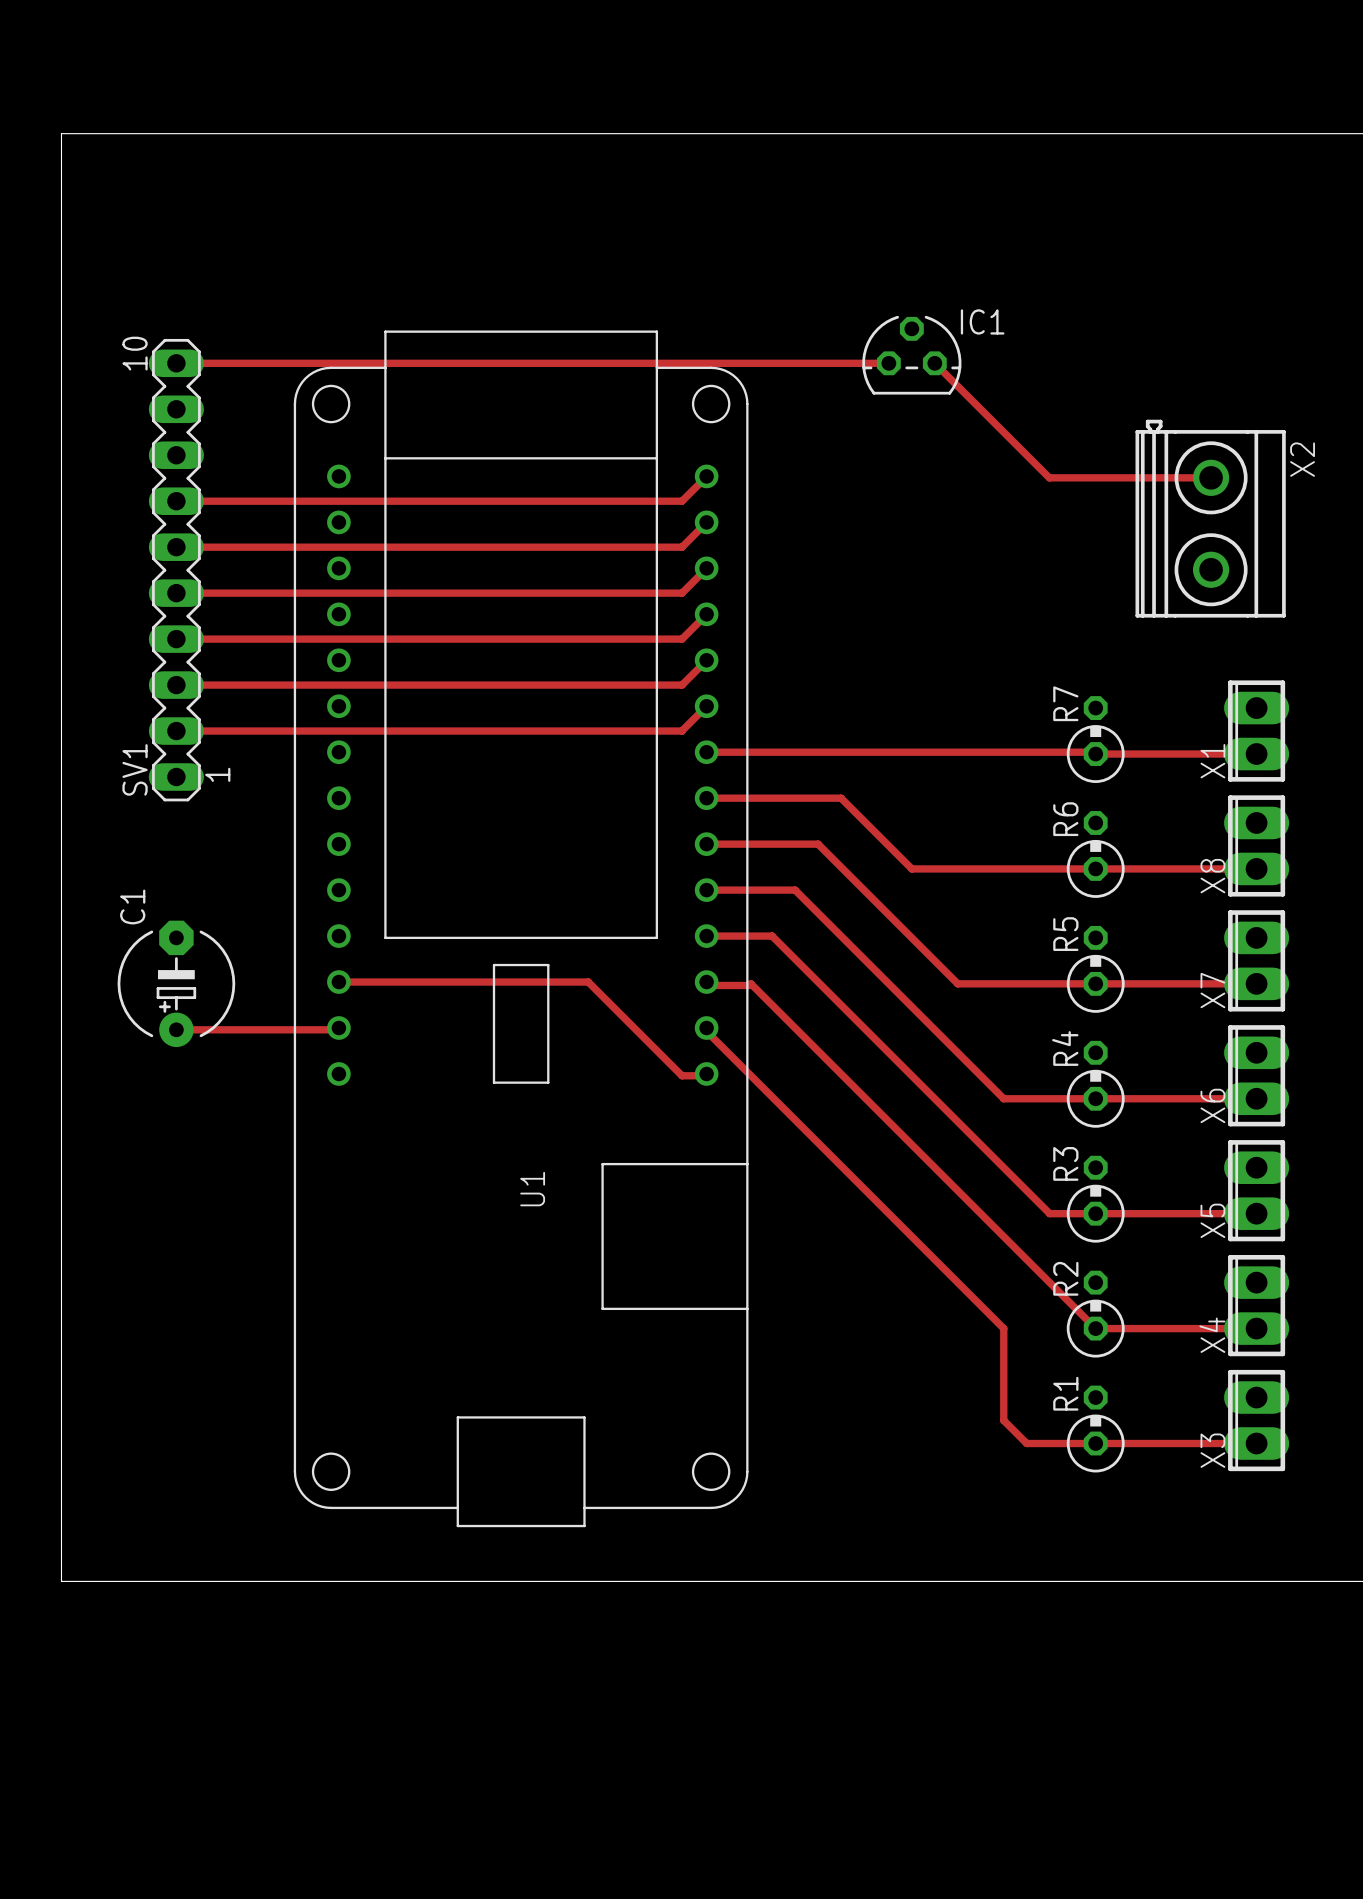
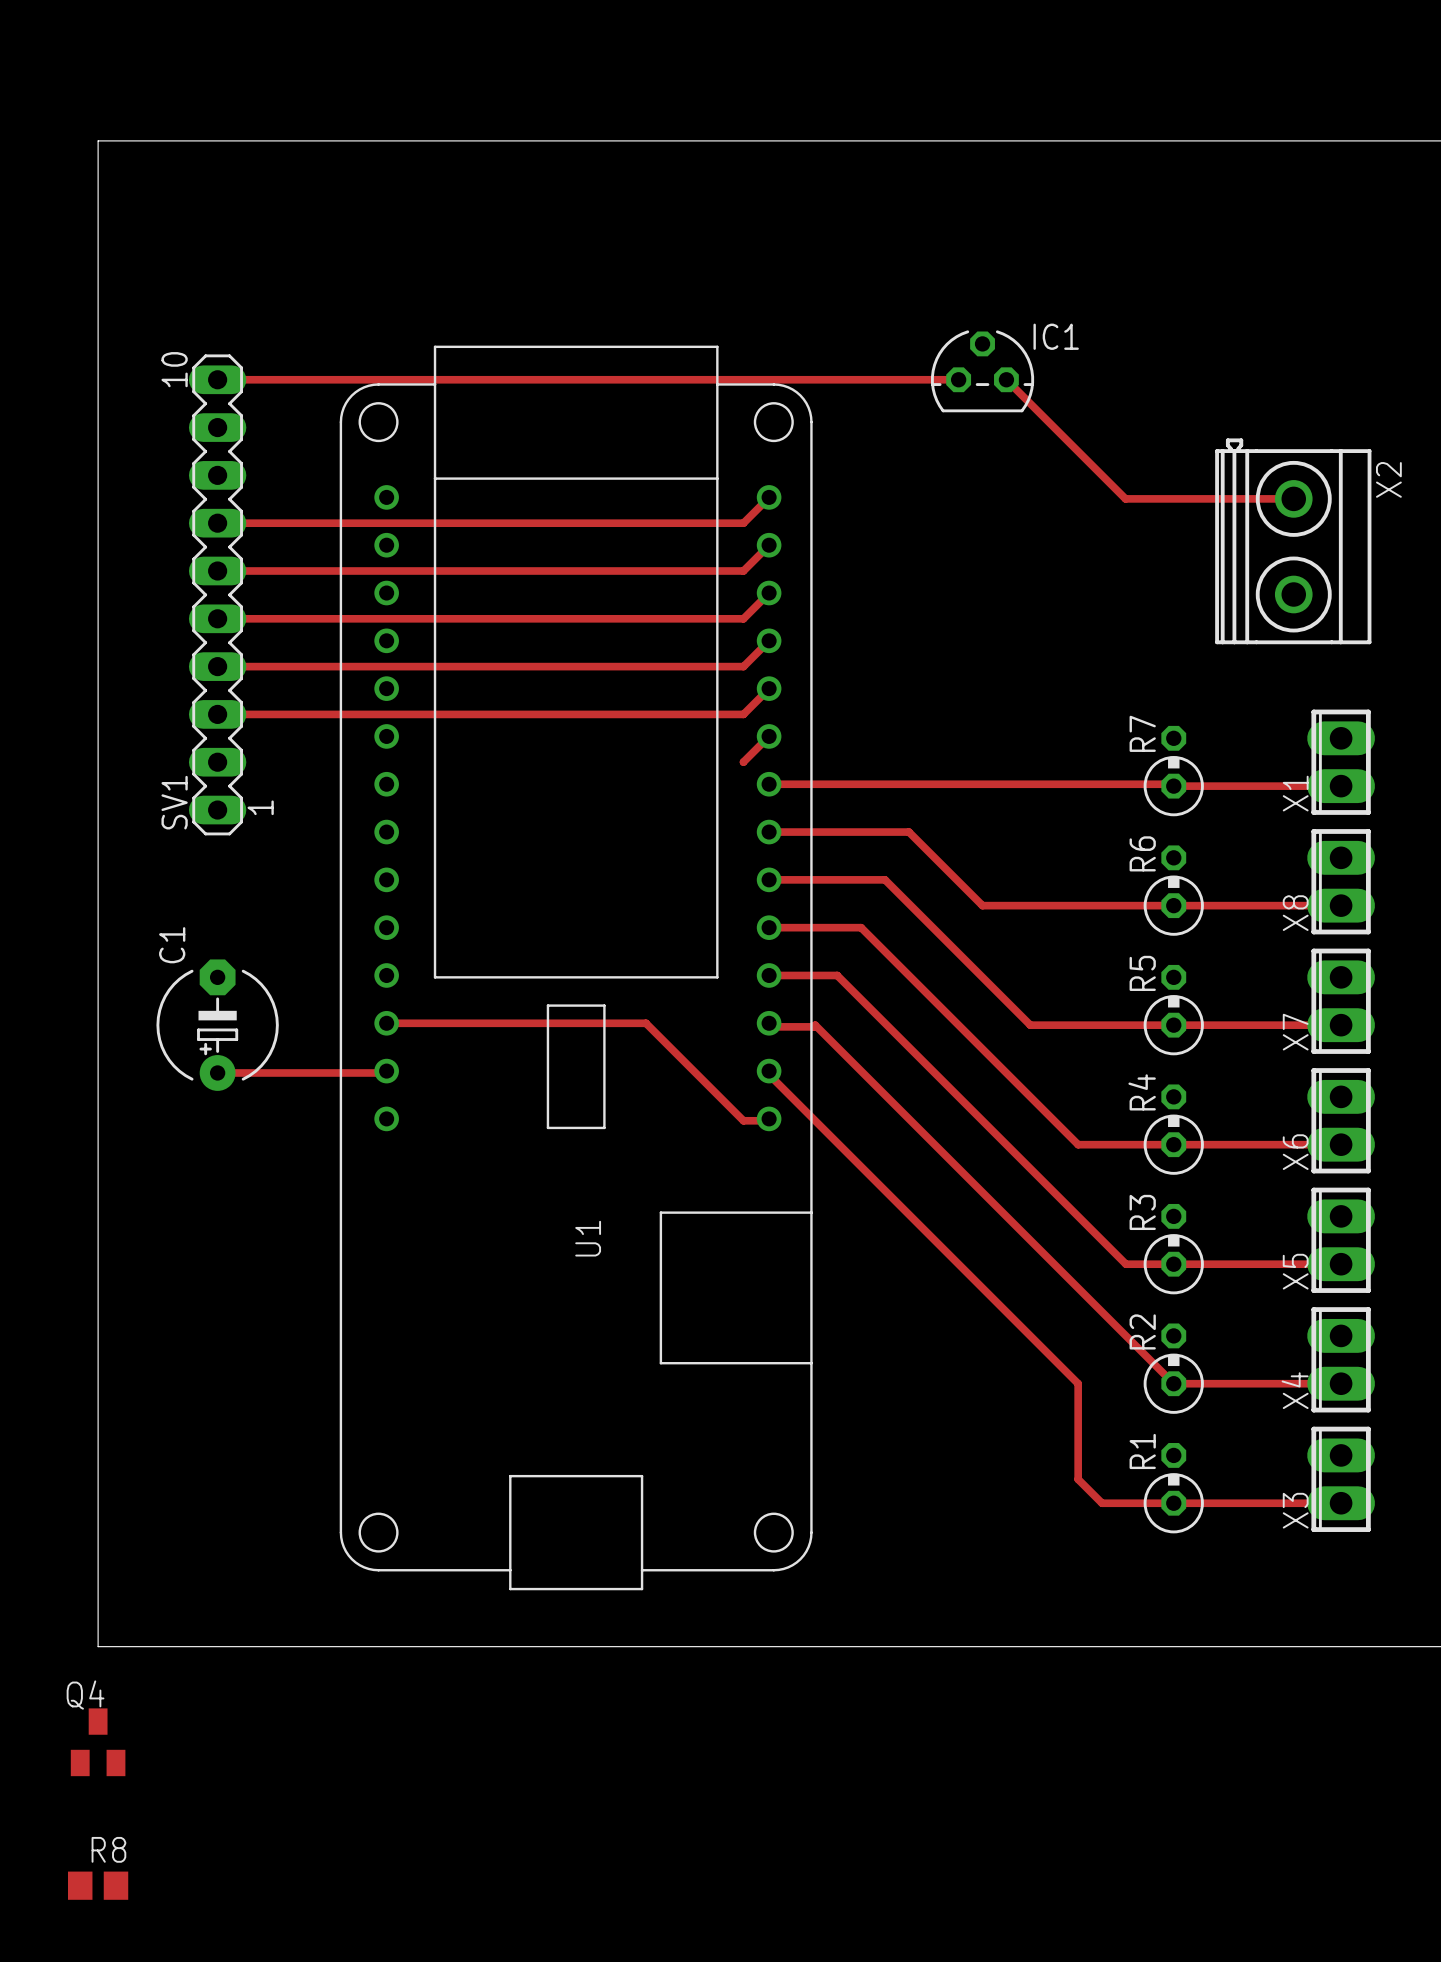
track: (176, 731) (682, 731) -> none
Q4: none -> (98, 1742)
R8: none -> (98, 1885)

